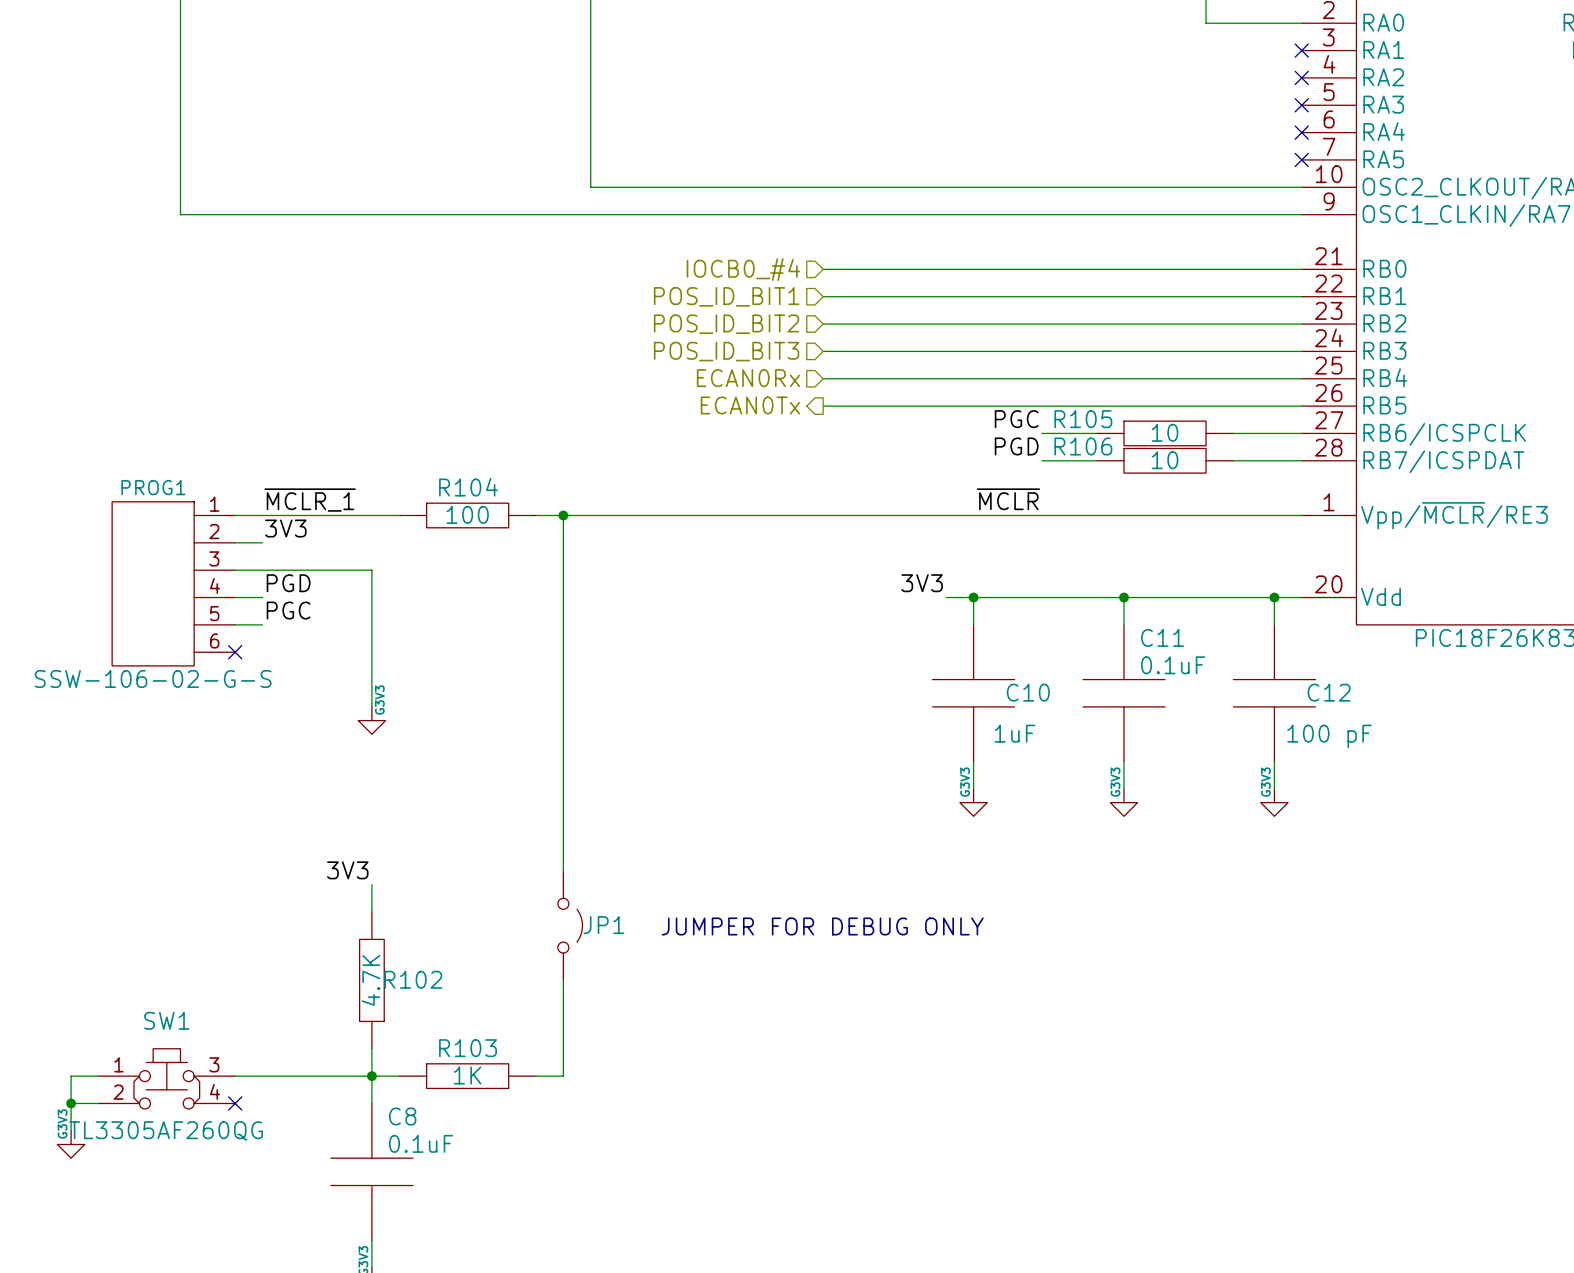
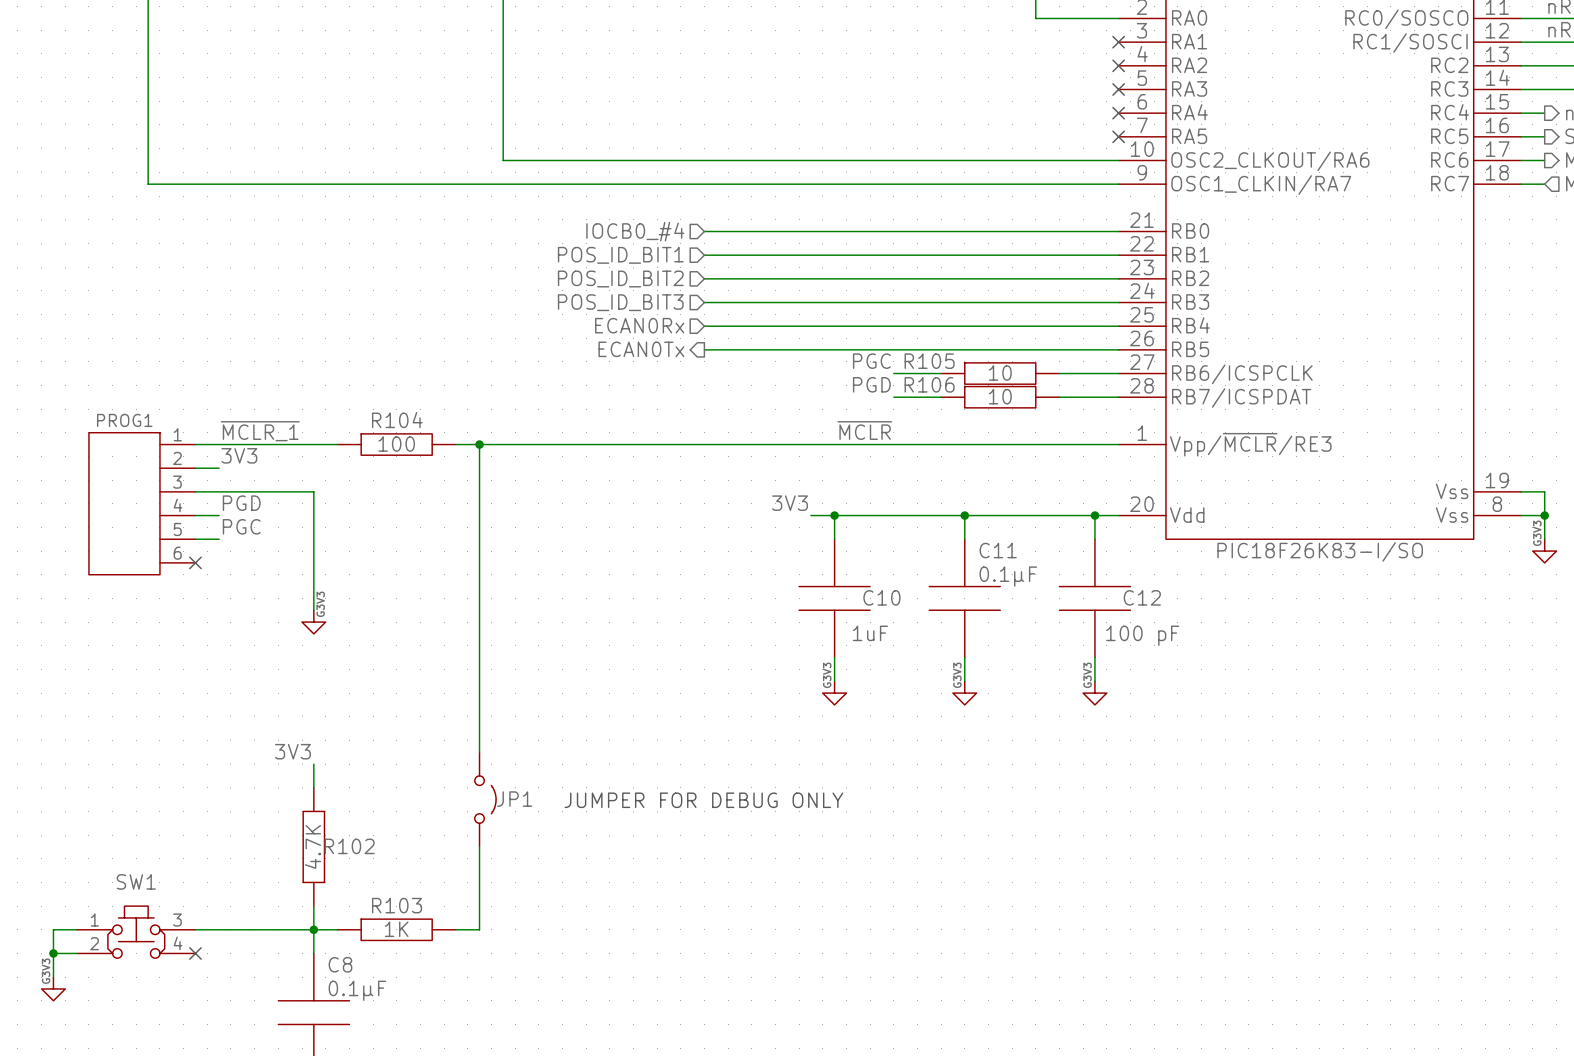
C11 text: 0.1uF (1173, 665) -> 0.1µF (1008, 576)
PROG1 text: SSW-106-02-G-S (153, 678) -> none
SW1 text: TL3305AF260QG (166, 1130) -> none
C8 text: 0.1uF (421, 1143) -> 0.1µF (357, 990)

